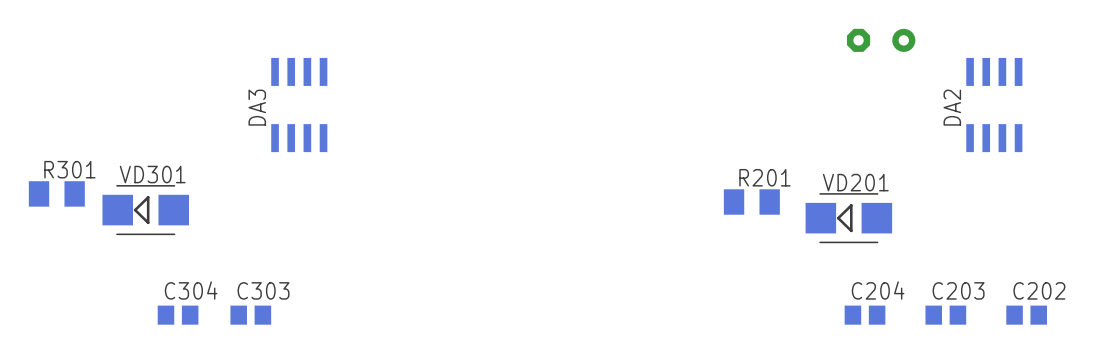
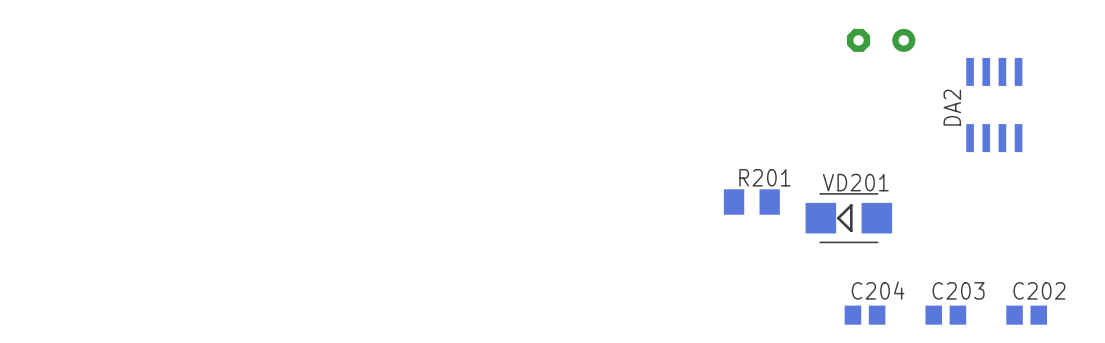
DA3: (299, 105) -> none
R301: (56, 193) -> none
VD301: (145, 210) -> none
C304: (178, 315) -> none
C303: (250, 315) -> none

